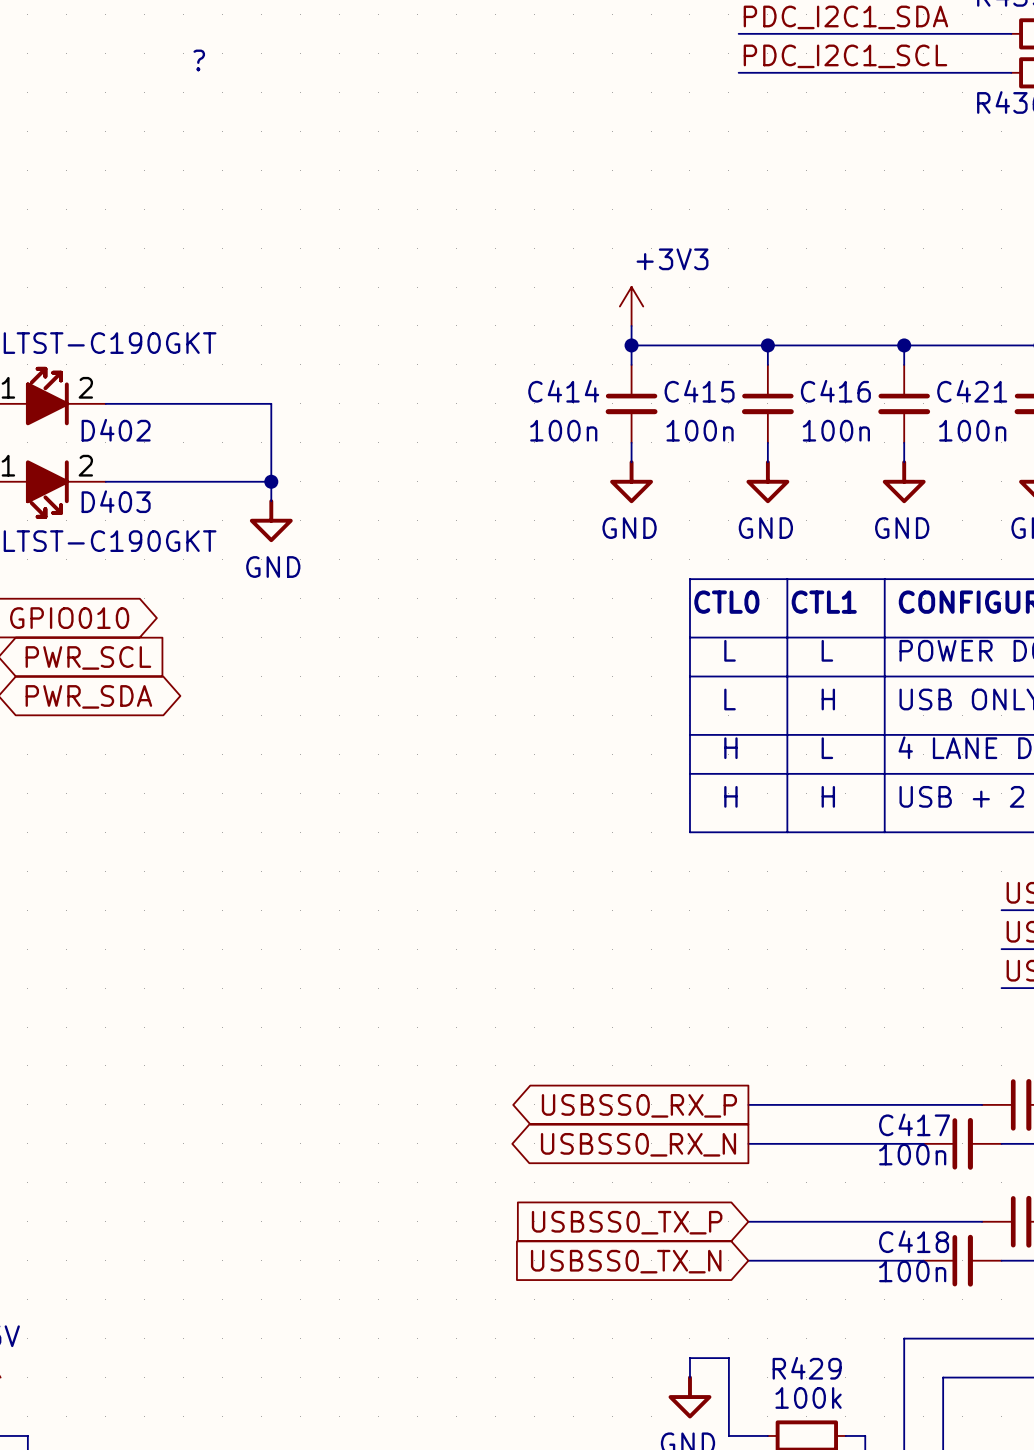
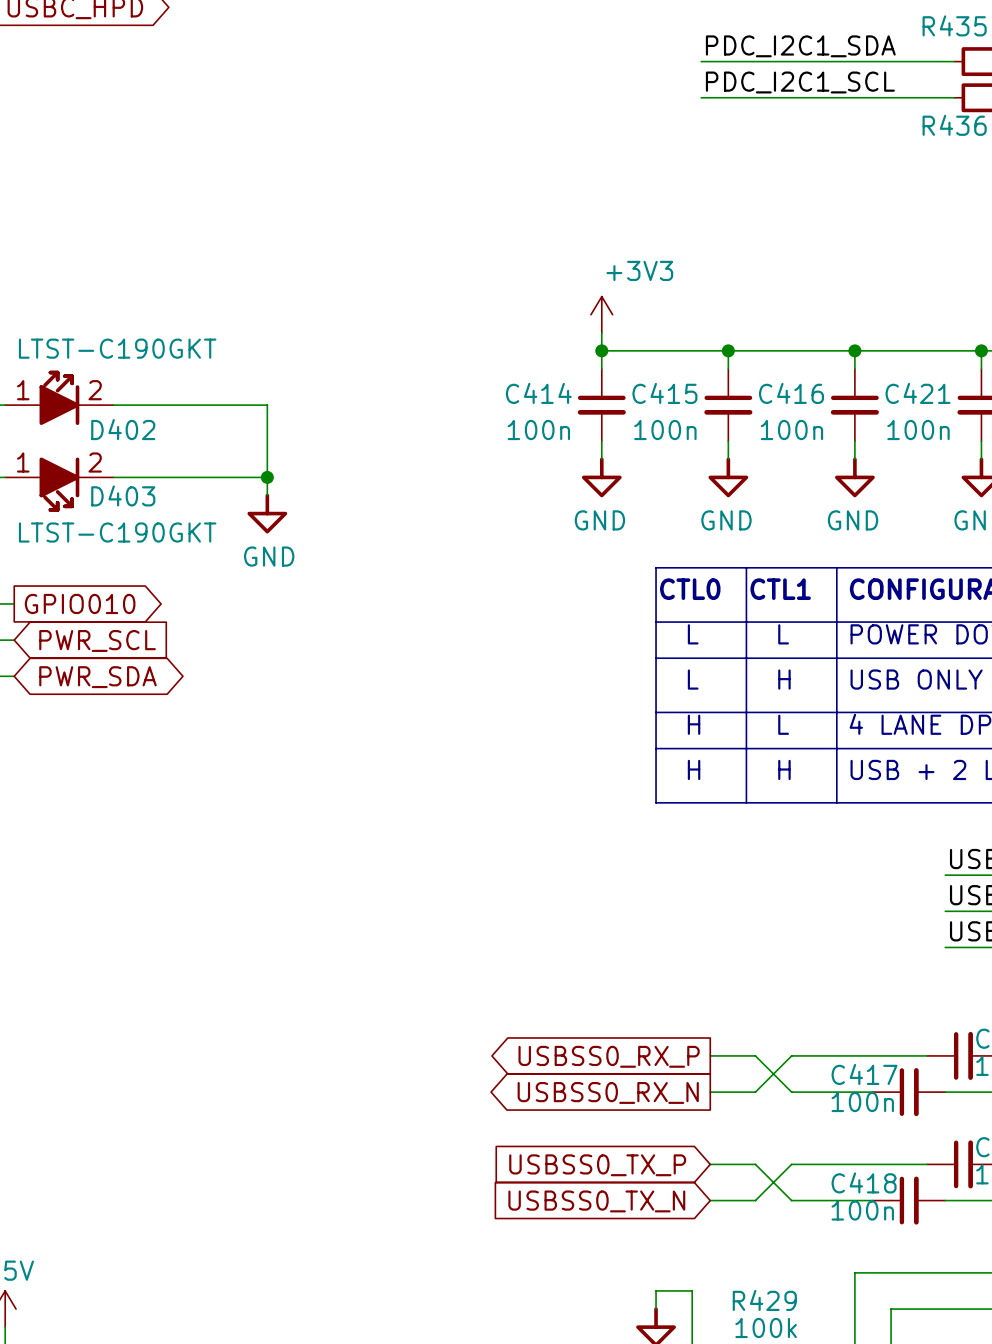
text: ? (199, 60) -> none
wire: (797, 1104) (836, 1104) -> (755, 1055) (791, 1092)
wire: (797, 1143) (836, 1143) -> (755, 1092) (791, 1055)
wire: (797, 1221) (836, 1221) -> (755, 1164) (791, 1200)
wire: (797, 1260) (836, 1260) -> (755, 1200) (791, 1164)

